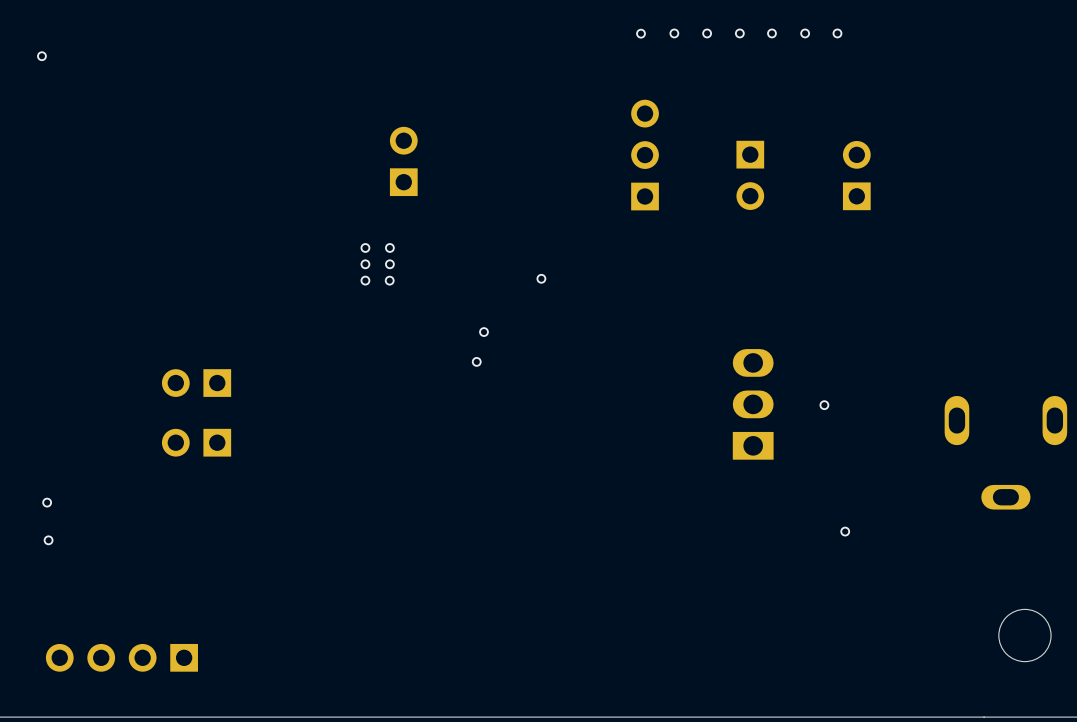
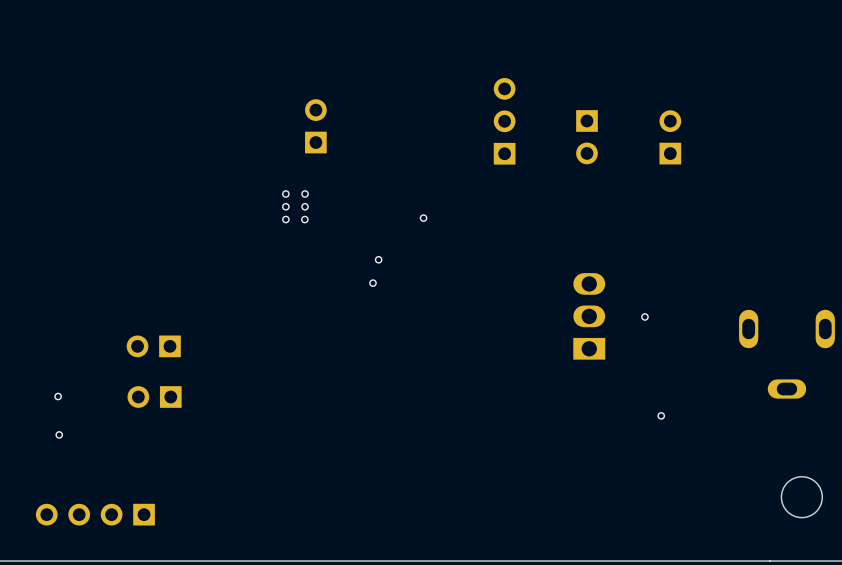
via: (641, 33) -> none
via: (674, 33) -> none
via: (707, 33) -> none
via: (739, 33) -> none
via: (771, 33) -> none
via: (805, 33) -> none
via: (837, 33) -> none
via: (41, 56) -> none
part position: (196, 383) -> (154, 396)
via: (47, 502) -> none
via: none -> (58, 396)
via: (48, 540) -> none
via: none -> (59, 434)

